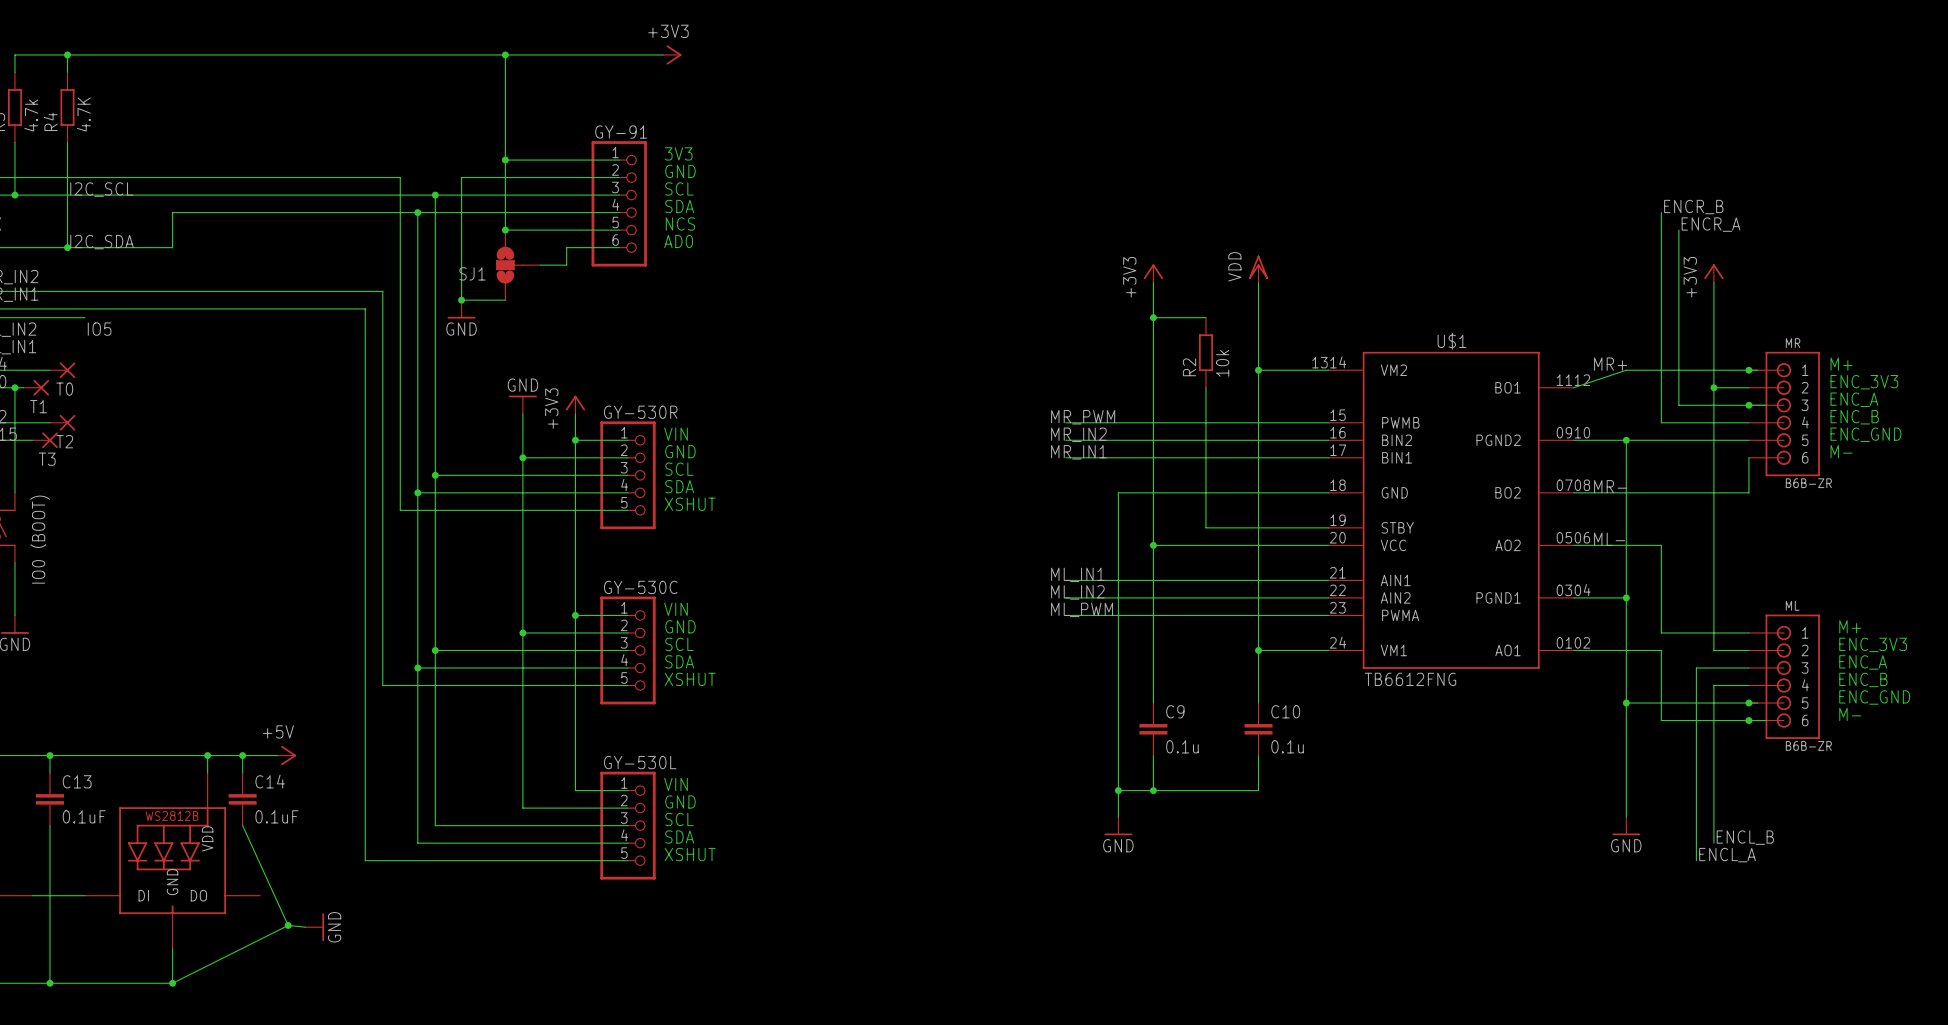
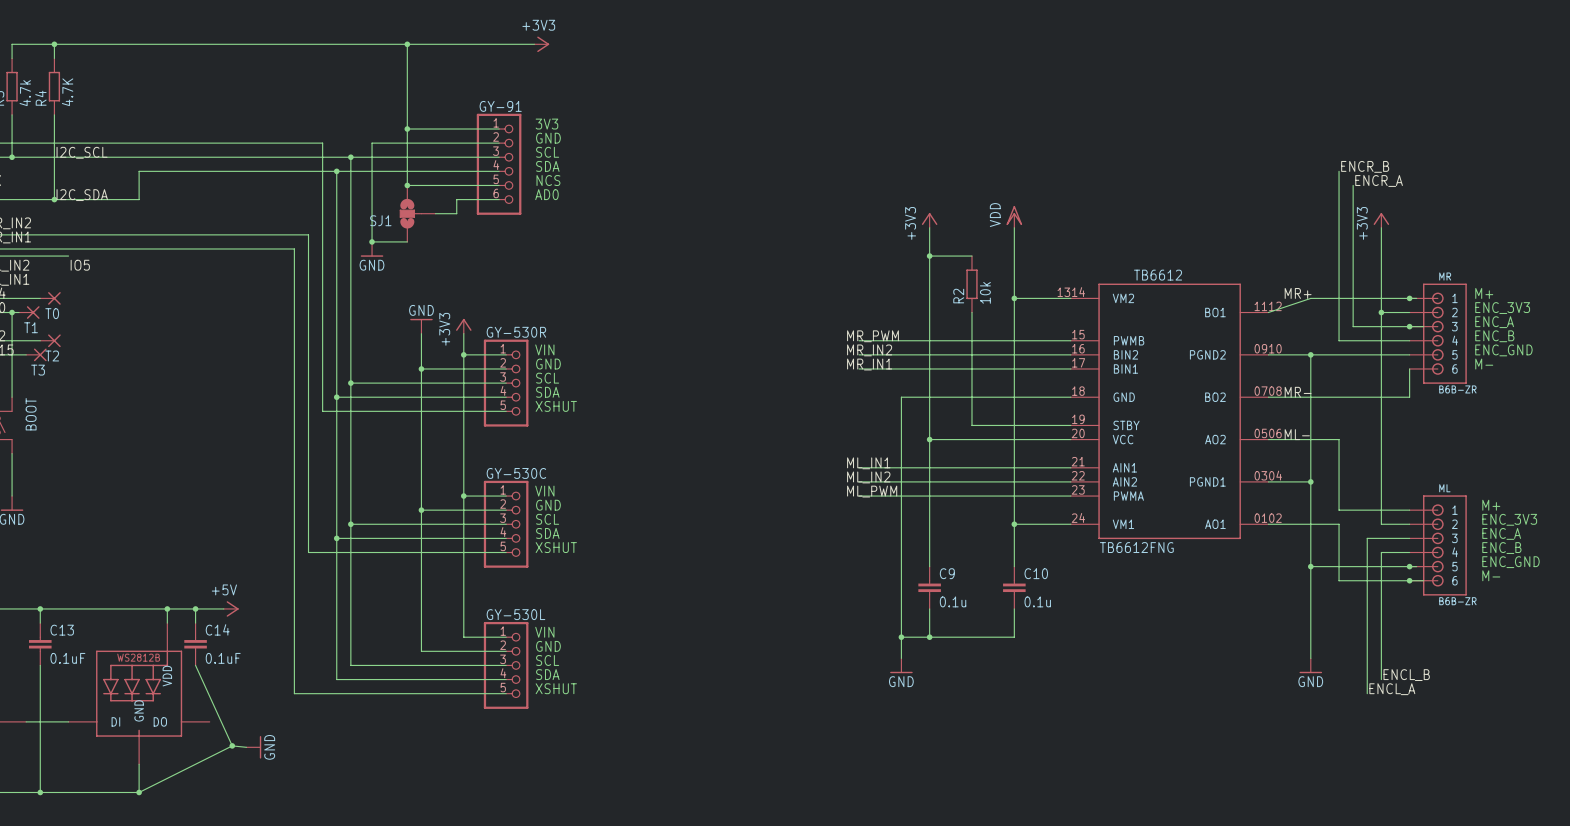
U$1 name: U$1 (1452, 341) -> TB6612 (1158, 275)
IO0（BOOT) name: IO0（BOOT) (39, 539) -> BOOT (31, 414)

